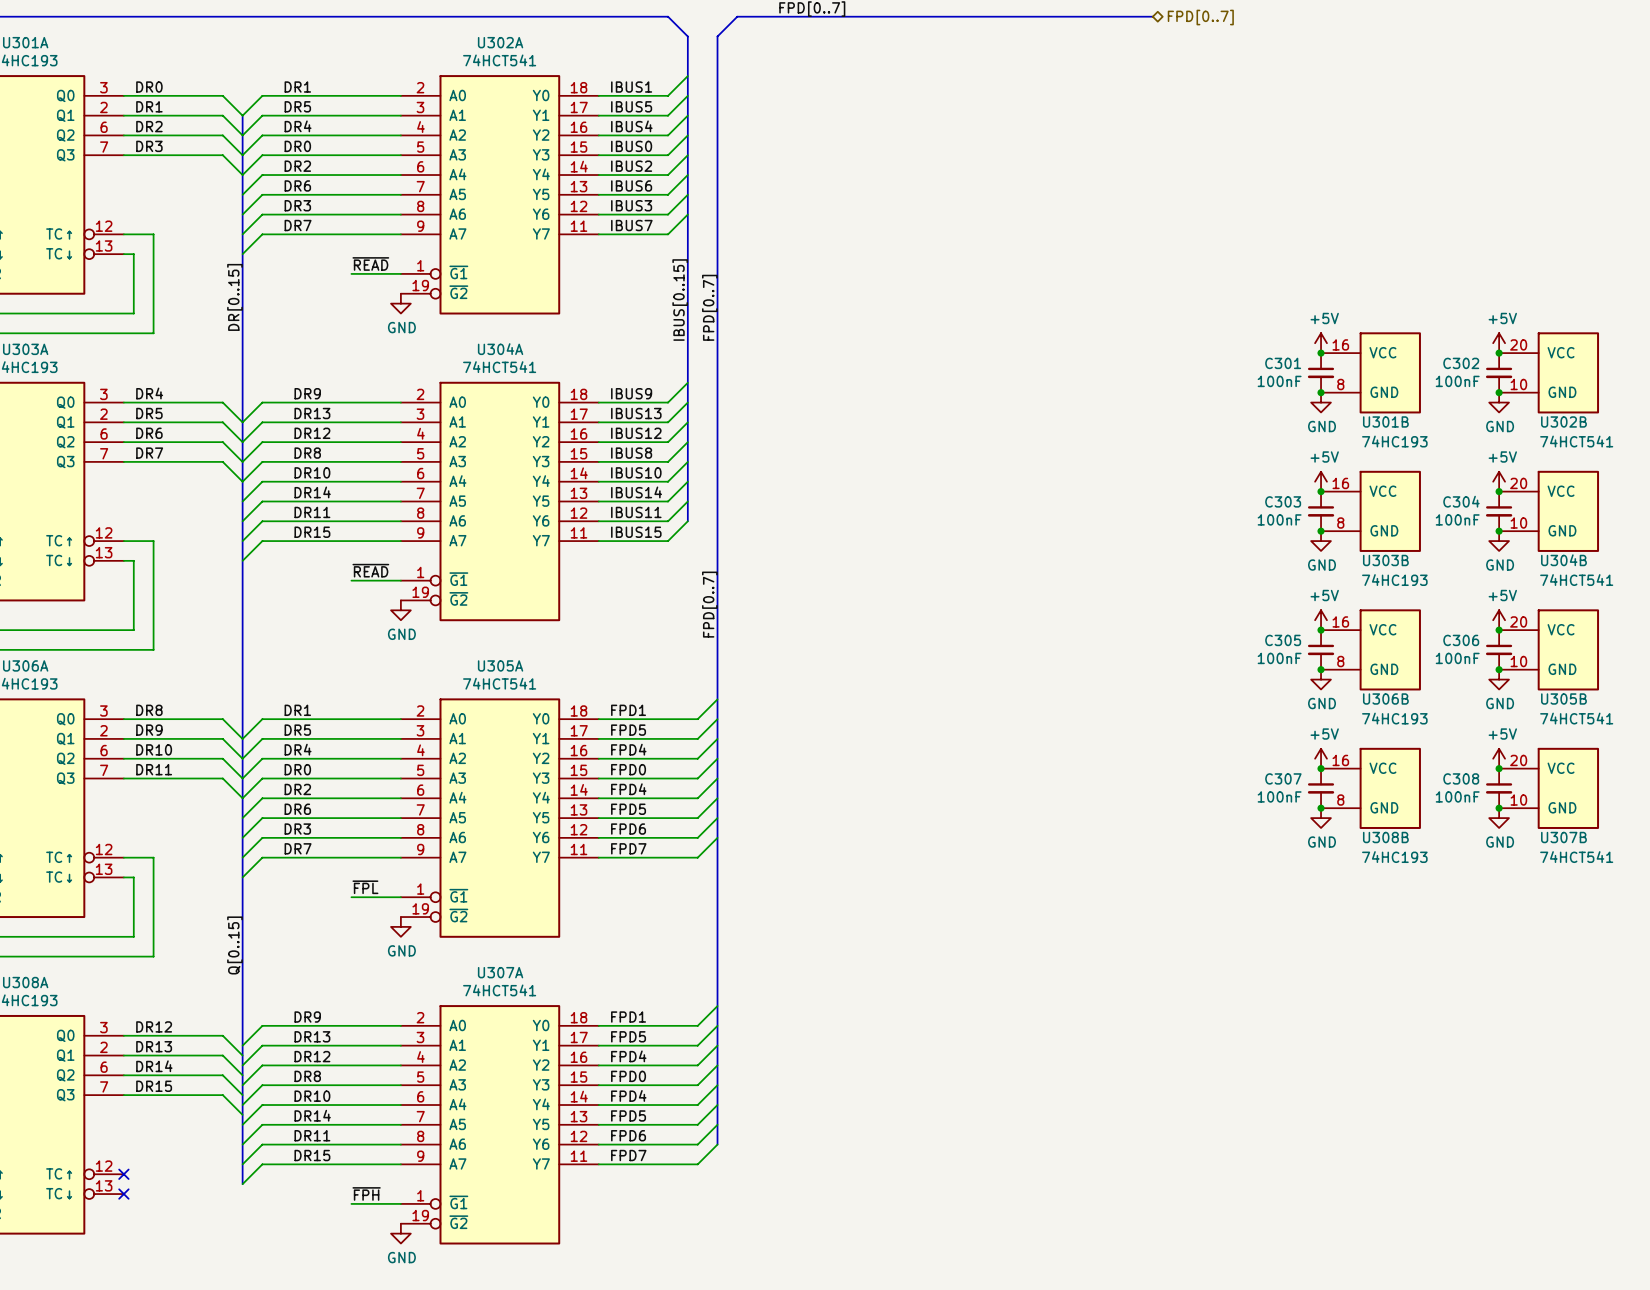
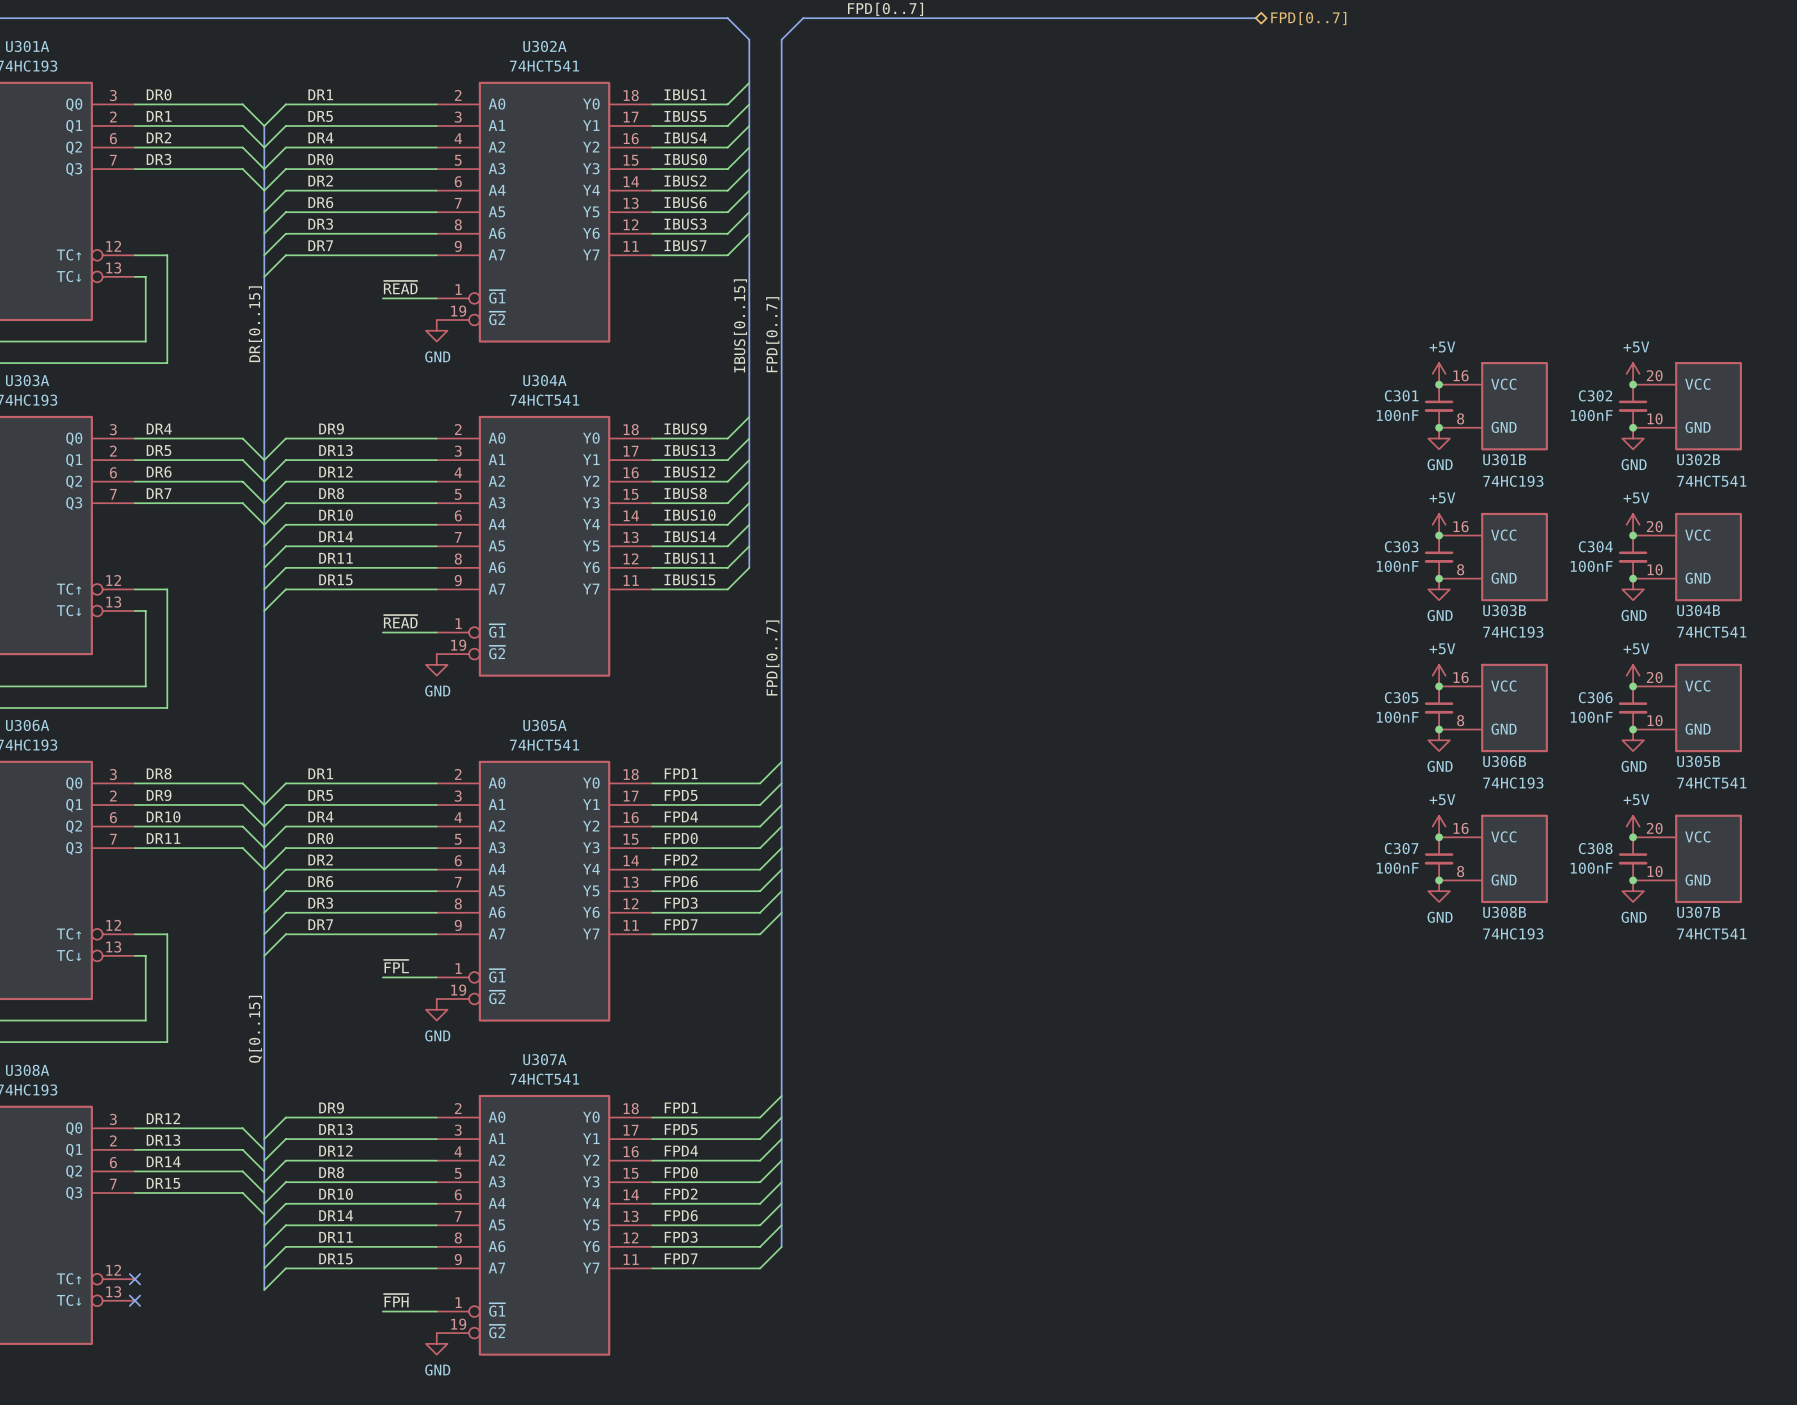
label: FPD4 (628, 789) -> FPD2 (681, 859)
label: FPD5 (628, 809) -> FPD6 (681, 881)
label: FPD6 (628, 829) -> FPD3 (681, 903)
label: FPD4 (628, 1095) -> FPD2 (681, 1194)
label: FPD5 (628, 1115) -> FPD6 (681, 1215)
label: FPD6 (628, 1135) -> FPD3 (681, 1237)

